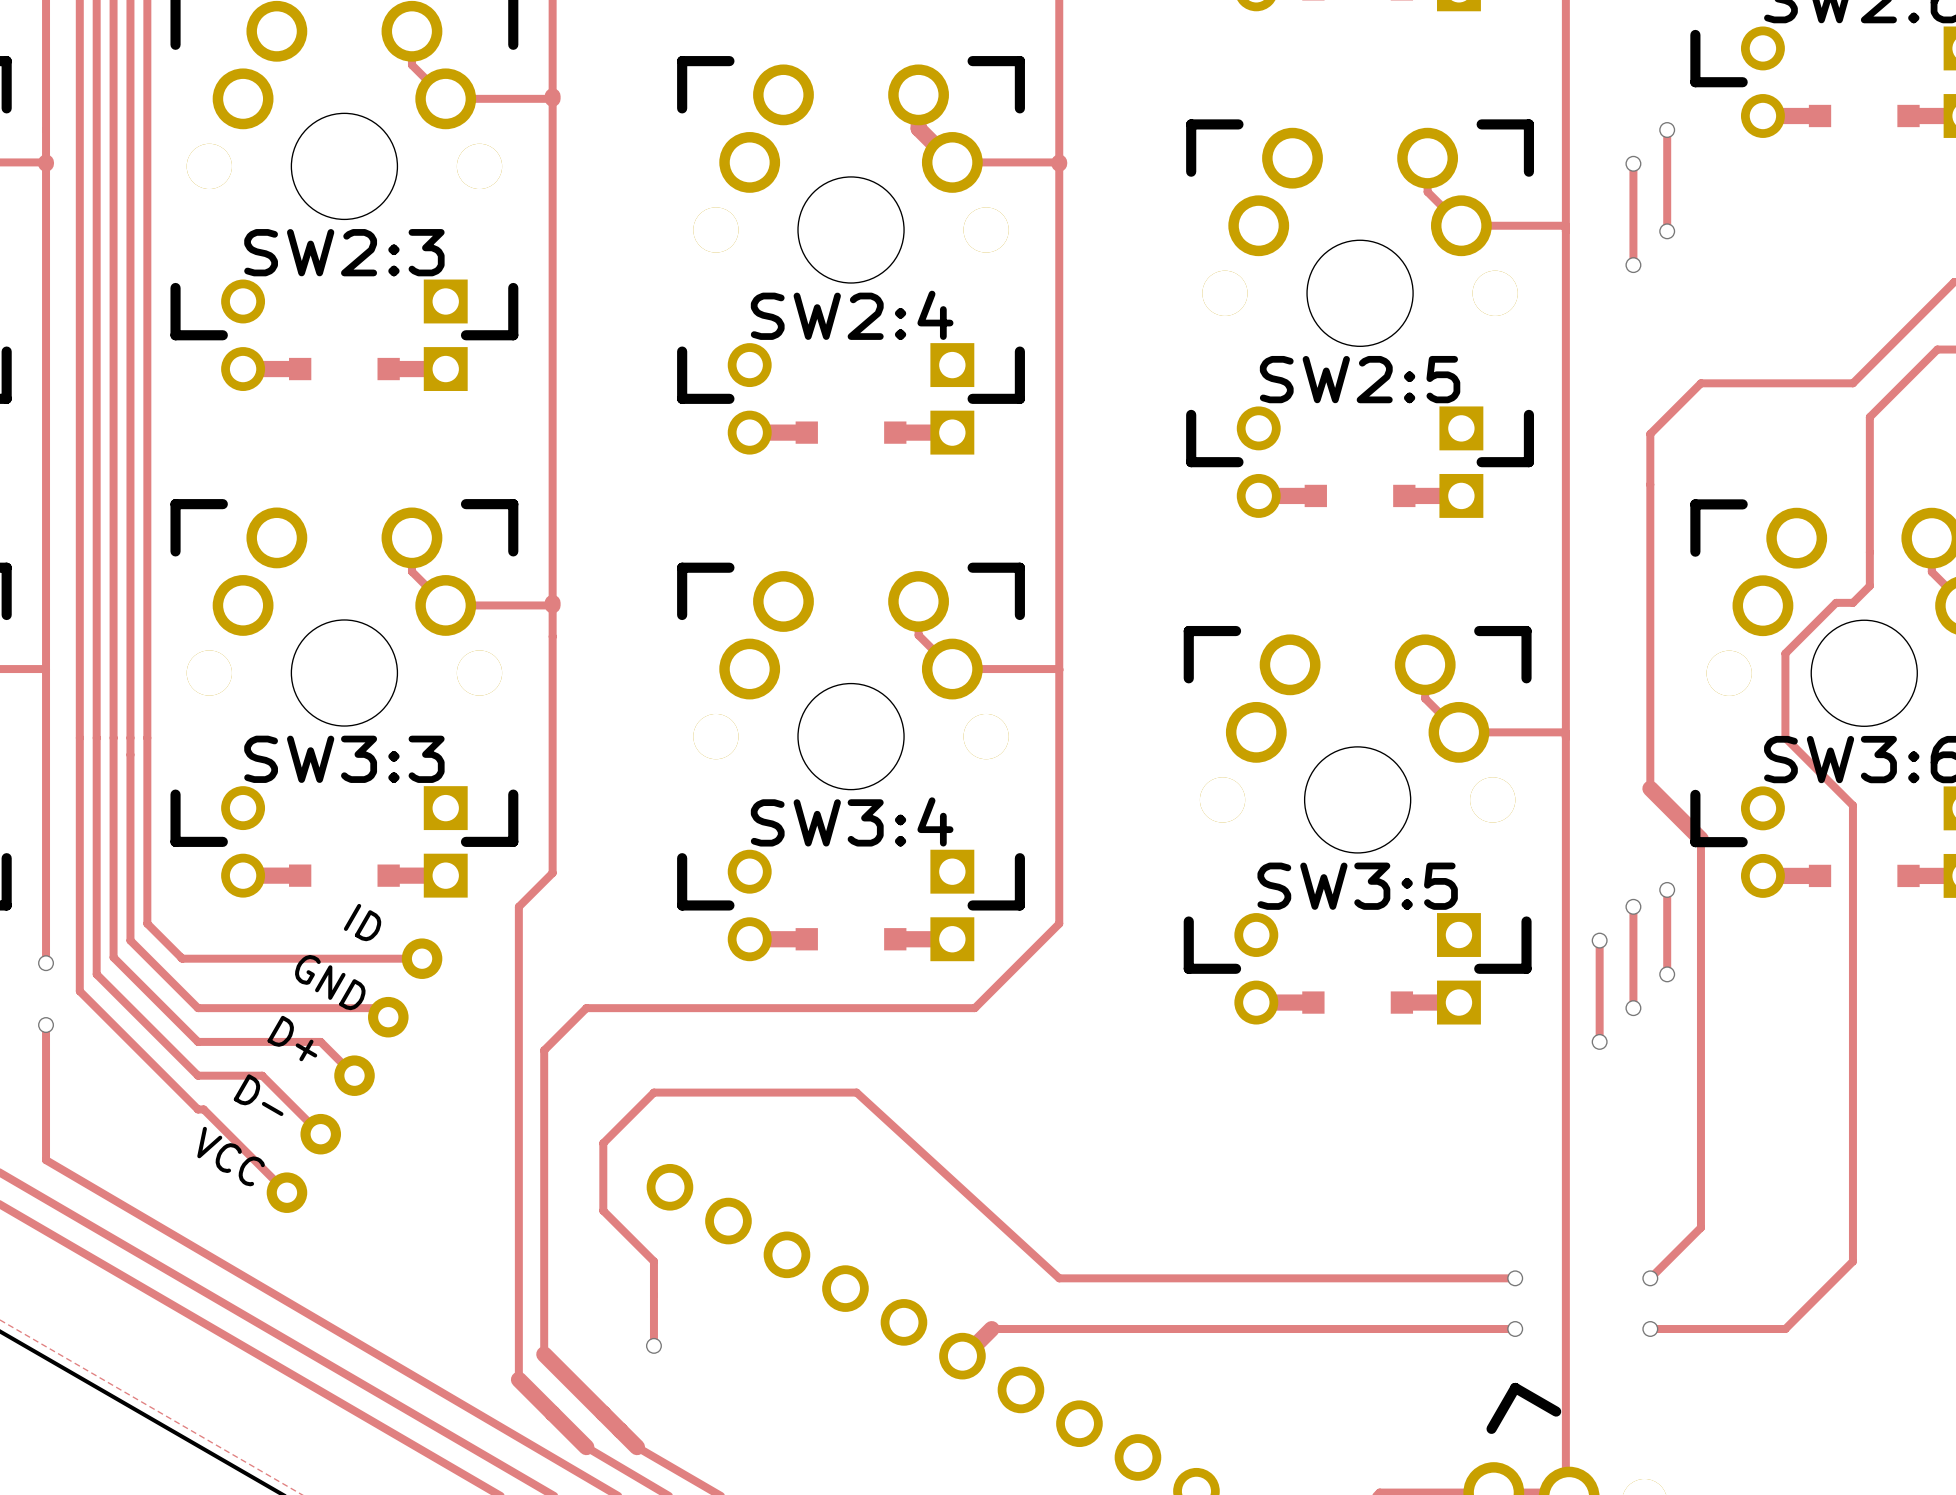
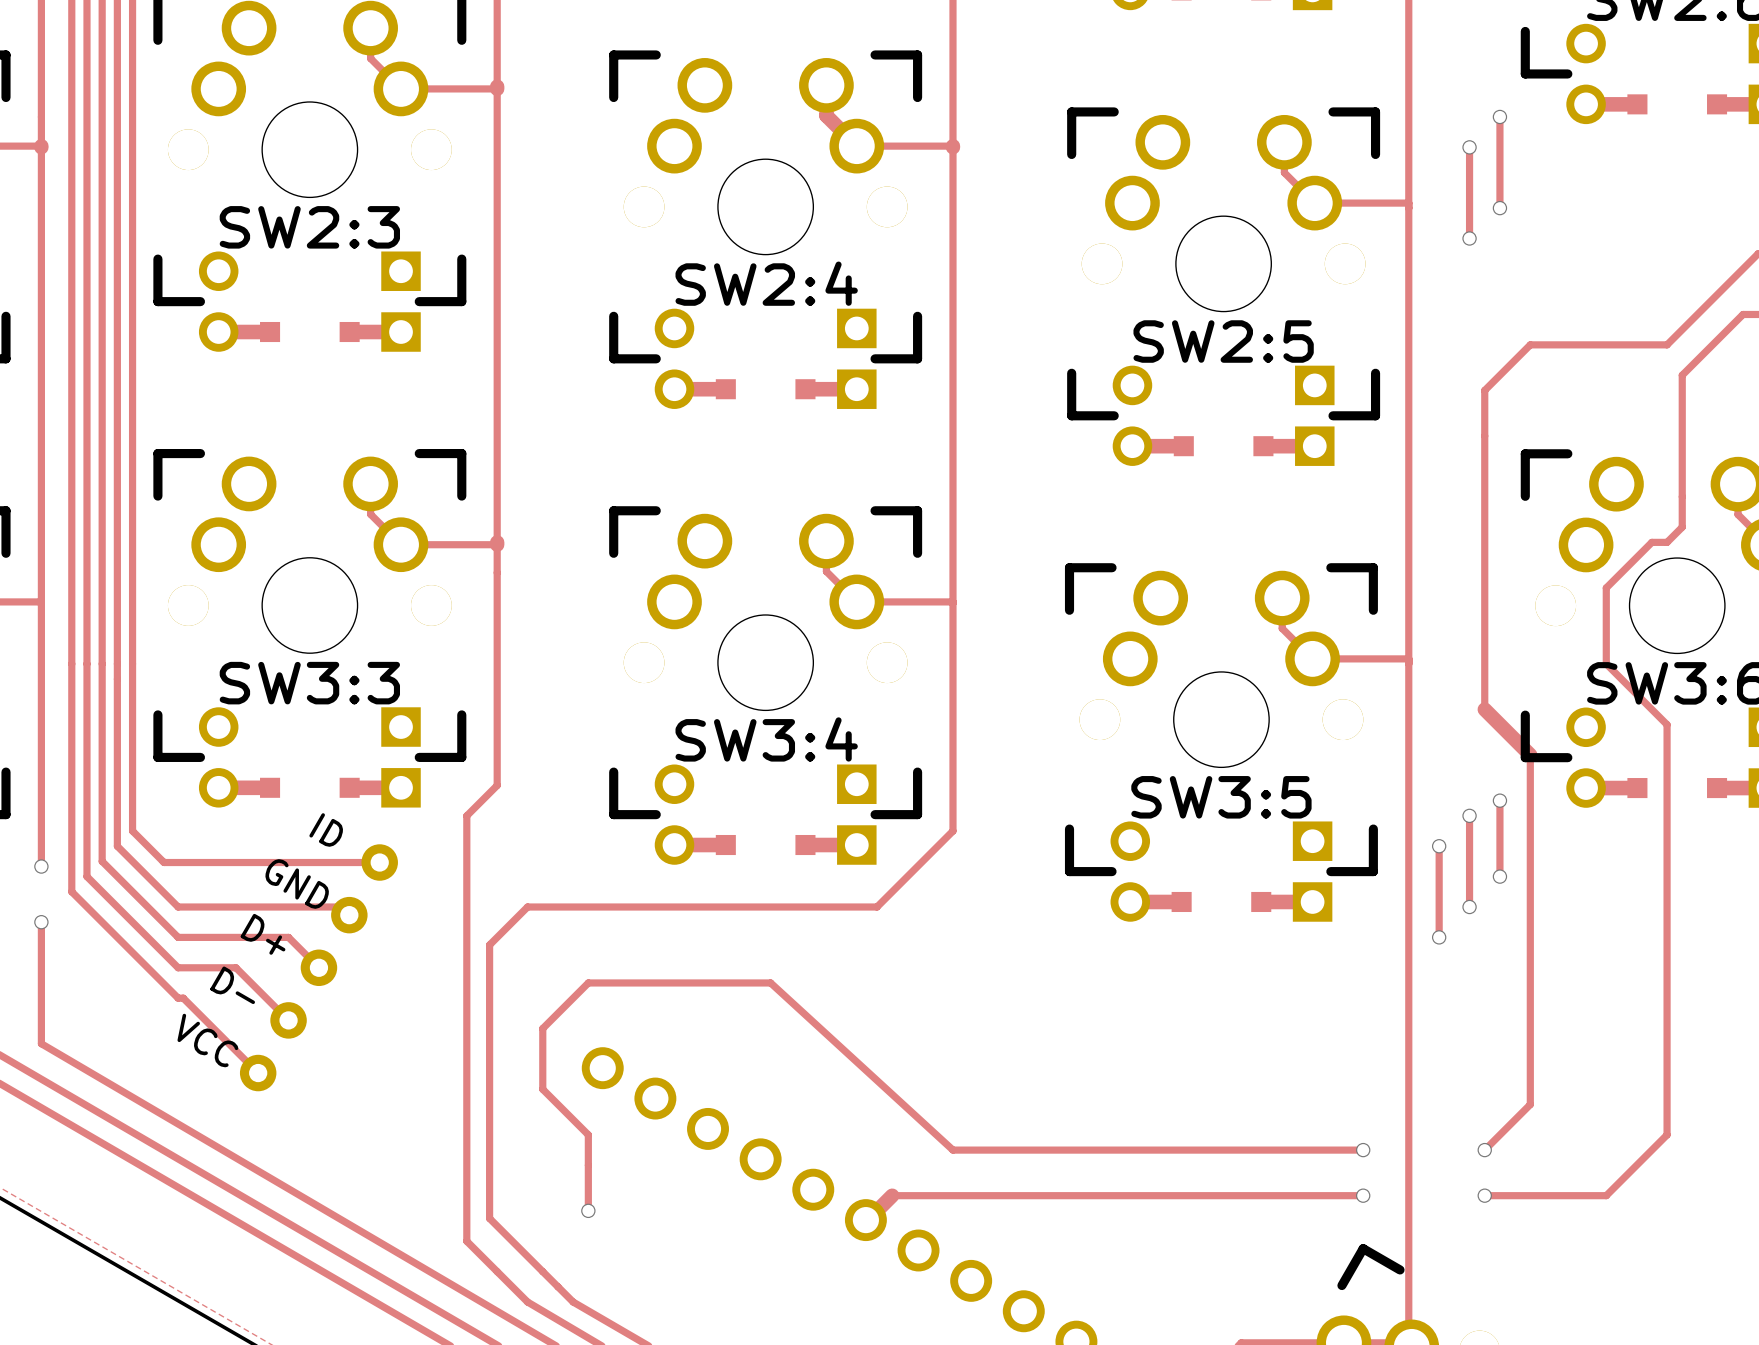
track width: thick (544, 1354) (637, 1447) -> thin (489, 1218) (573, 1302)
track width: thick (518, 1379) (586, 1447) -> thin (466, 1241) (527, 1302)

